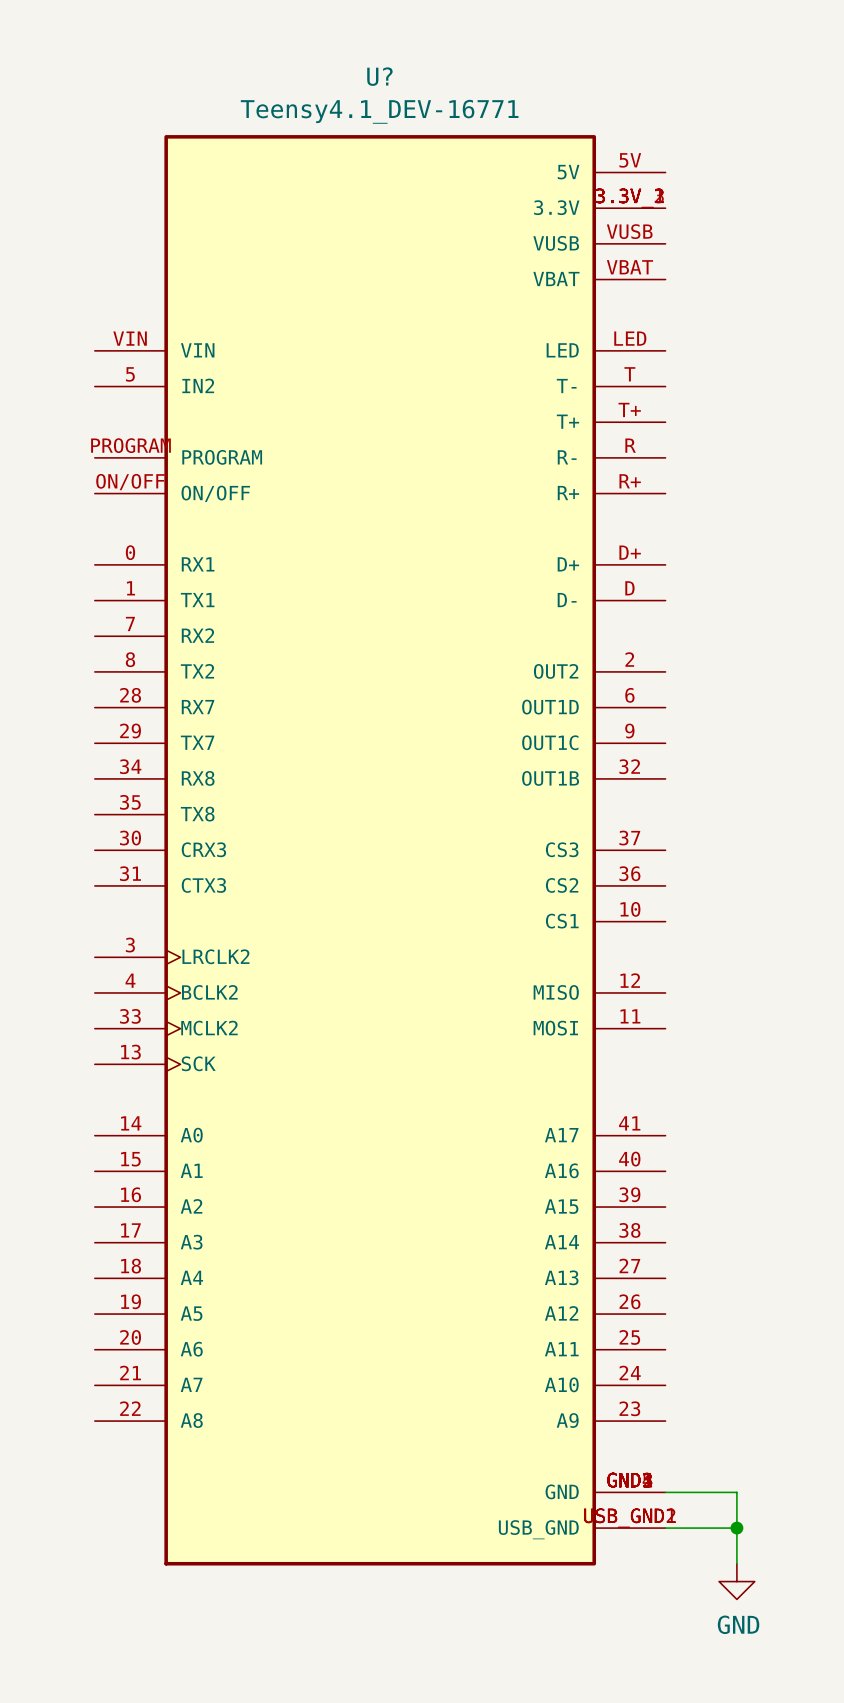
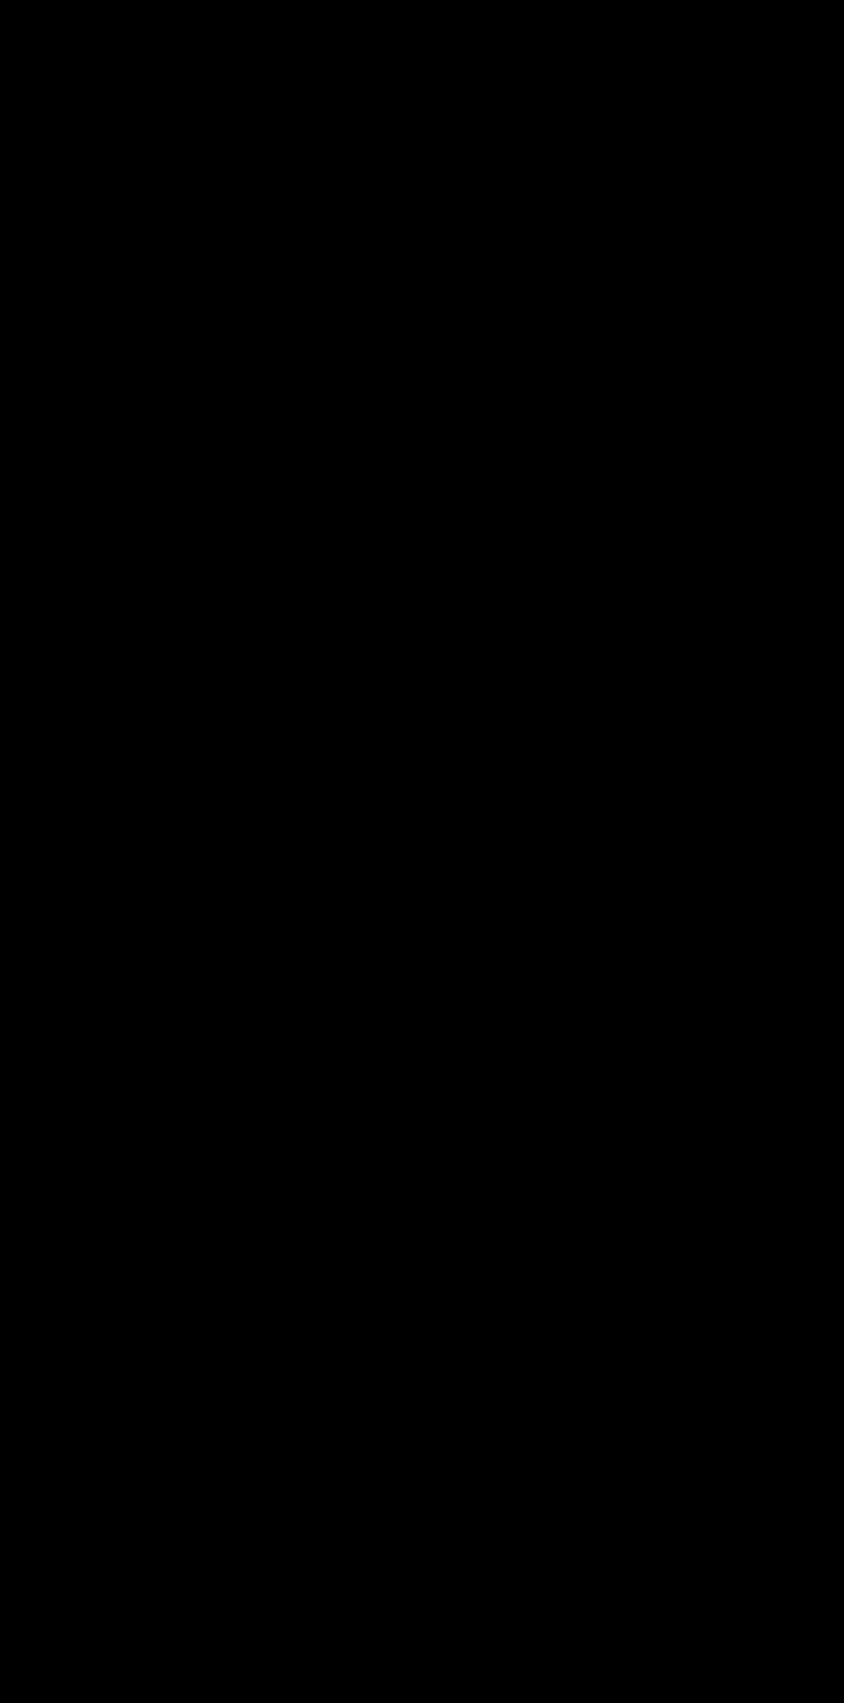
U?: Teensy4.1_DEV-16771 (380, 850) -> none
wire: (665, 1492) (736, 1492) (736, 1563) -> none
wire: (665, 1528) (736, 1528) -> none
junction: (736, 1528) -> none
power symbol: GND (736, 1581) -> none

